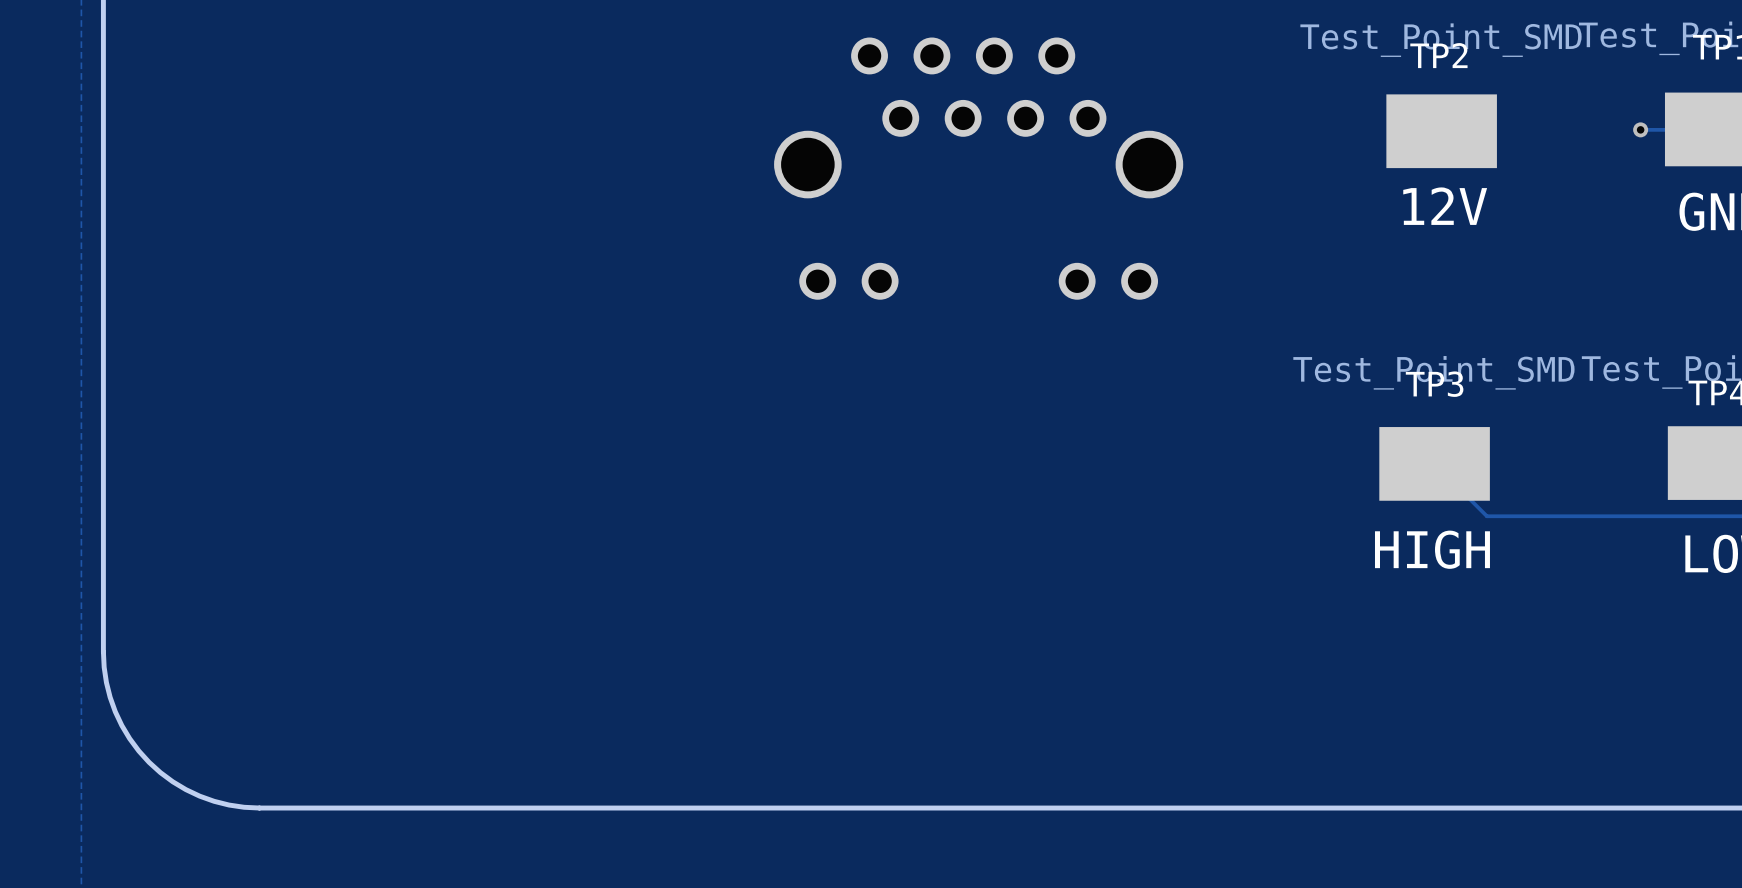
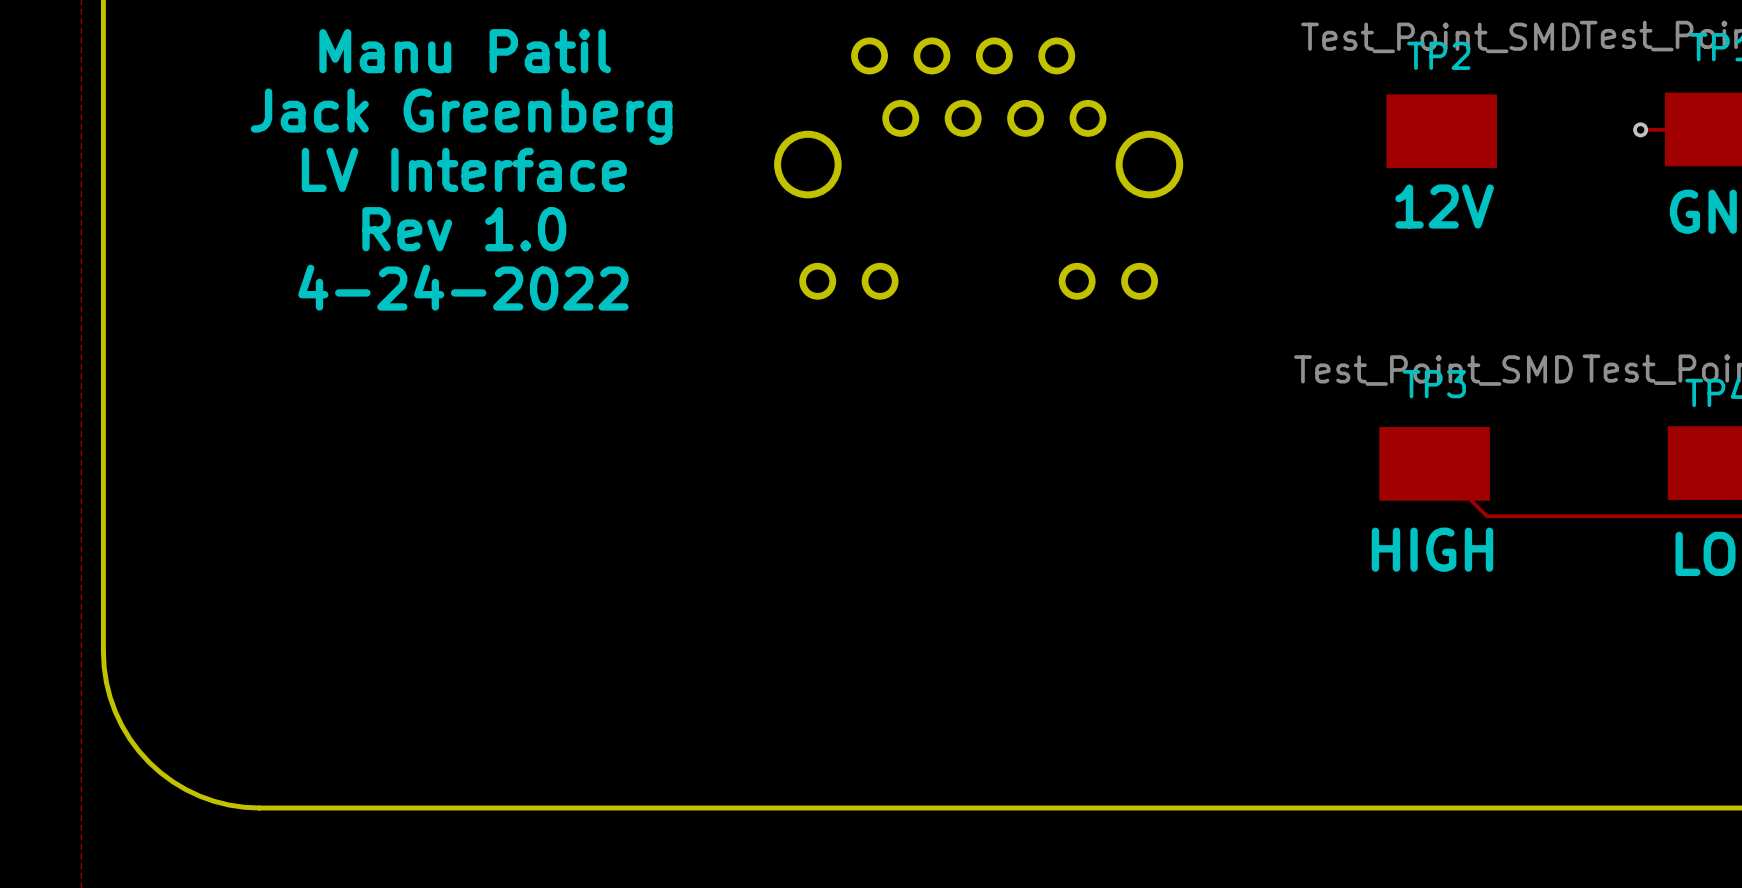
text: none -> Manu Patil (465, 51)
text: none -> Jack Greenberg (461, 116)
text: none -> LV Interface (464, 169)
text: none -> Rev 1.0 (464, 229)
text: none -> 4-24-2022 (463, 287)

